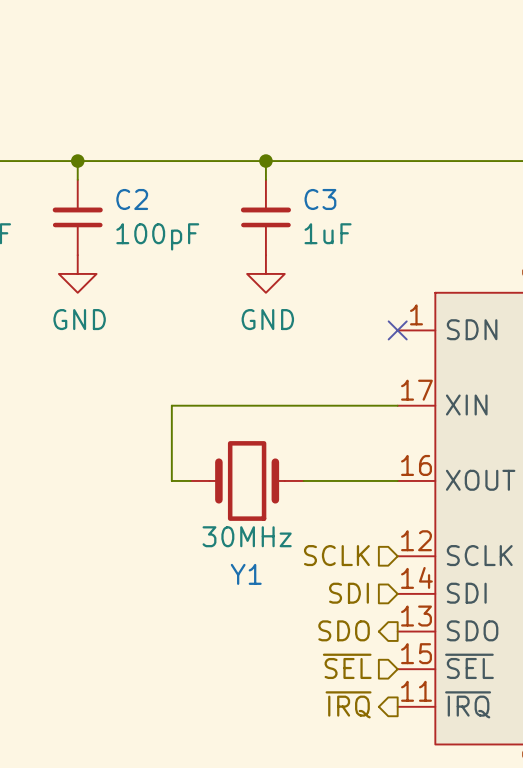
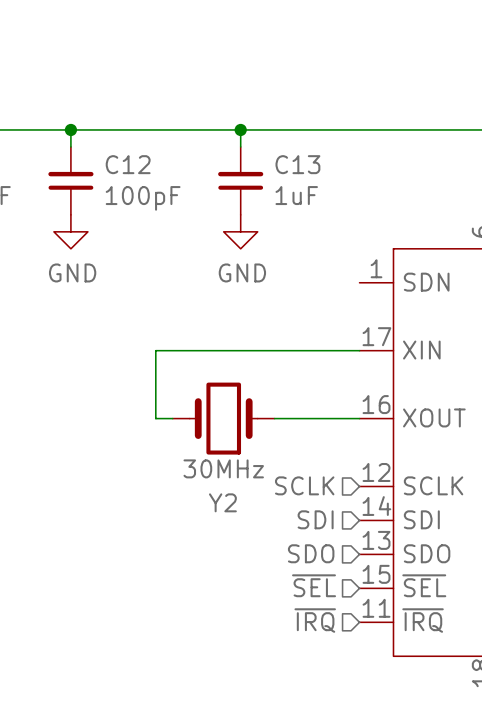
C2 name: C2 (132, 199) -> C12 (128, 164)
C3 name: C3 (320, 199) -> C13 (297, 164)
no-connect mark: (397, 330) -> none
Y1 name: Y1 (246, 574) -> Y2 (222, 502)
hierarchical label shape: output (344, 630) -> input (311, 553)
hierarchical label shape: output (348, 704) -> input (315, 620)

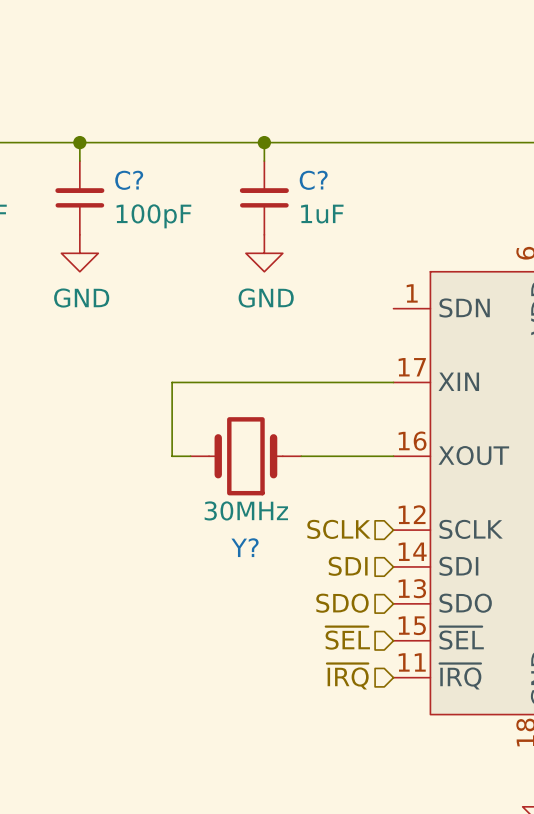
C12 name: C12 (128, 164) -> C? (129, 180)
C13 name: C13 (297, 164) -> C? (313, 180)
Y2 name: Y2 (222, 502) -> Y? (245, 547)

